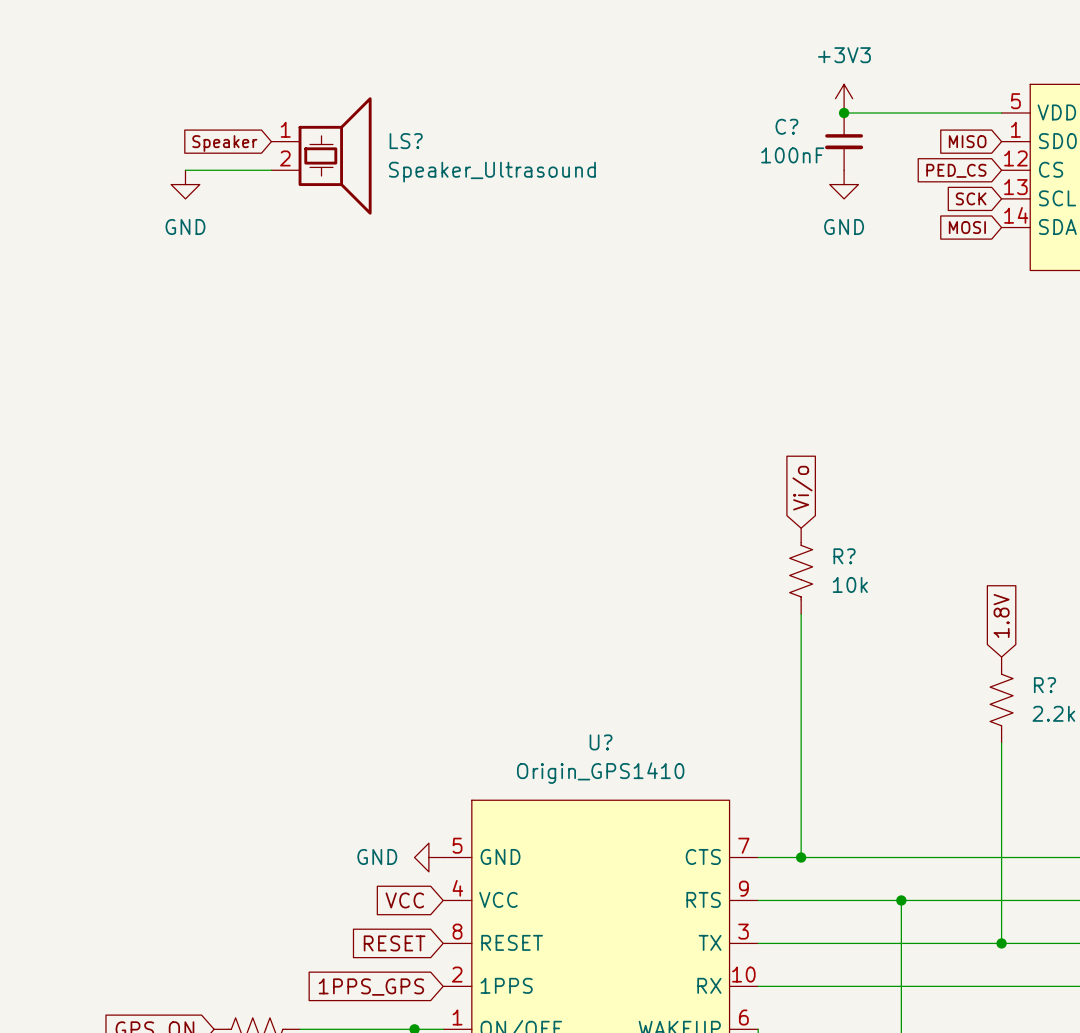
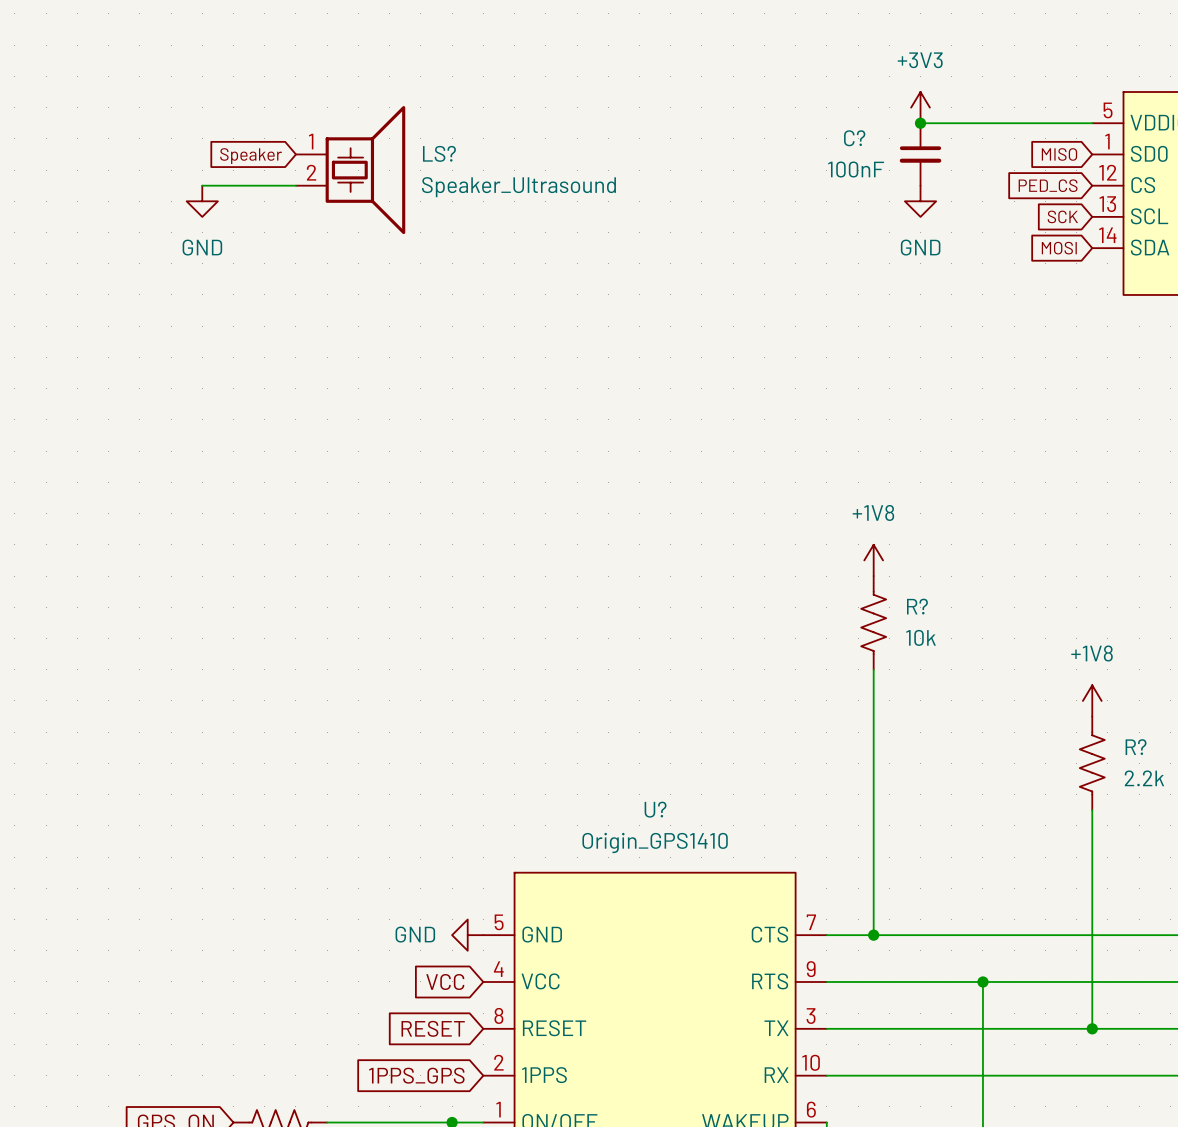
global label: Vi/o (802, 488) -> none
power symbol: none -> +1V8 (873, 560)
global label: 1.8V (1001, 615) -> none
power symbol: none -> +1V8 (1092, 700)

